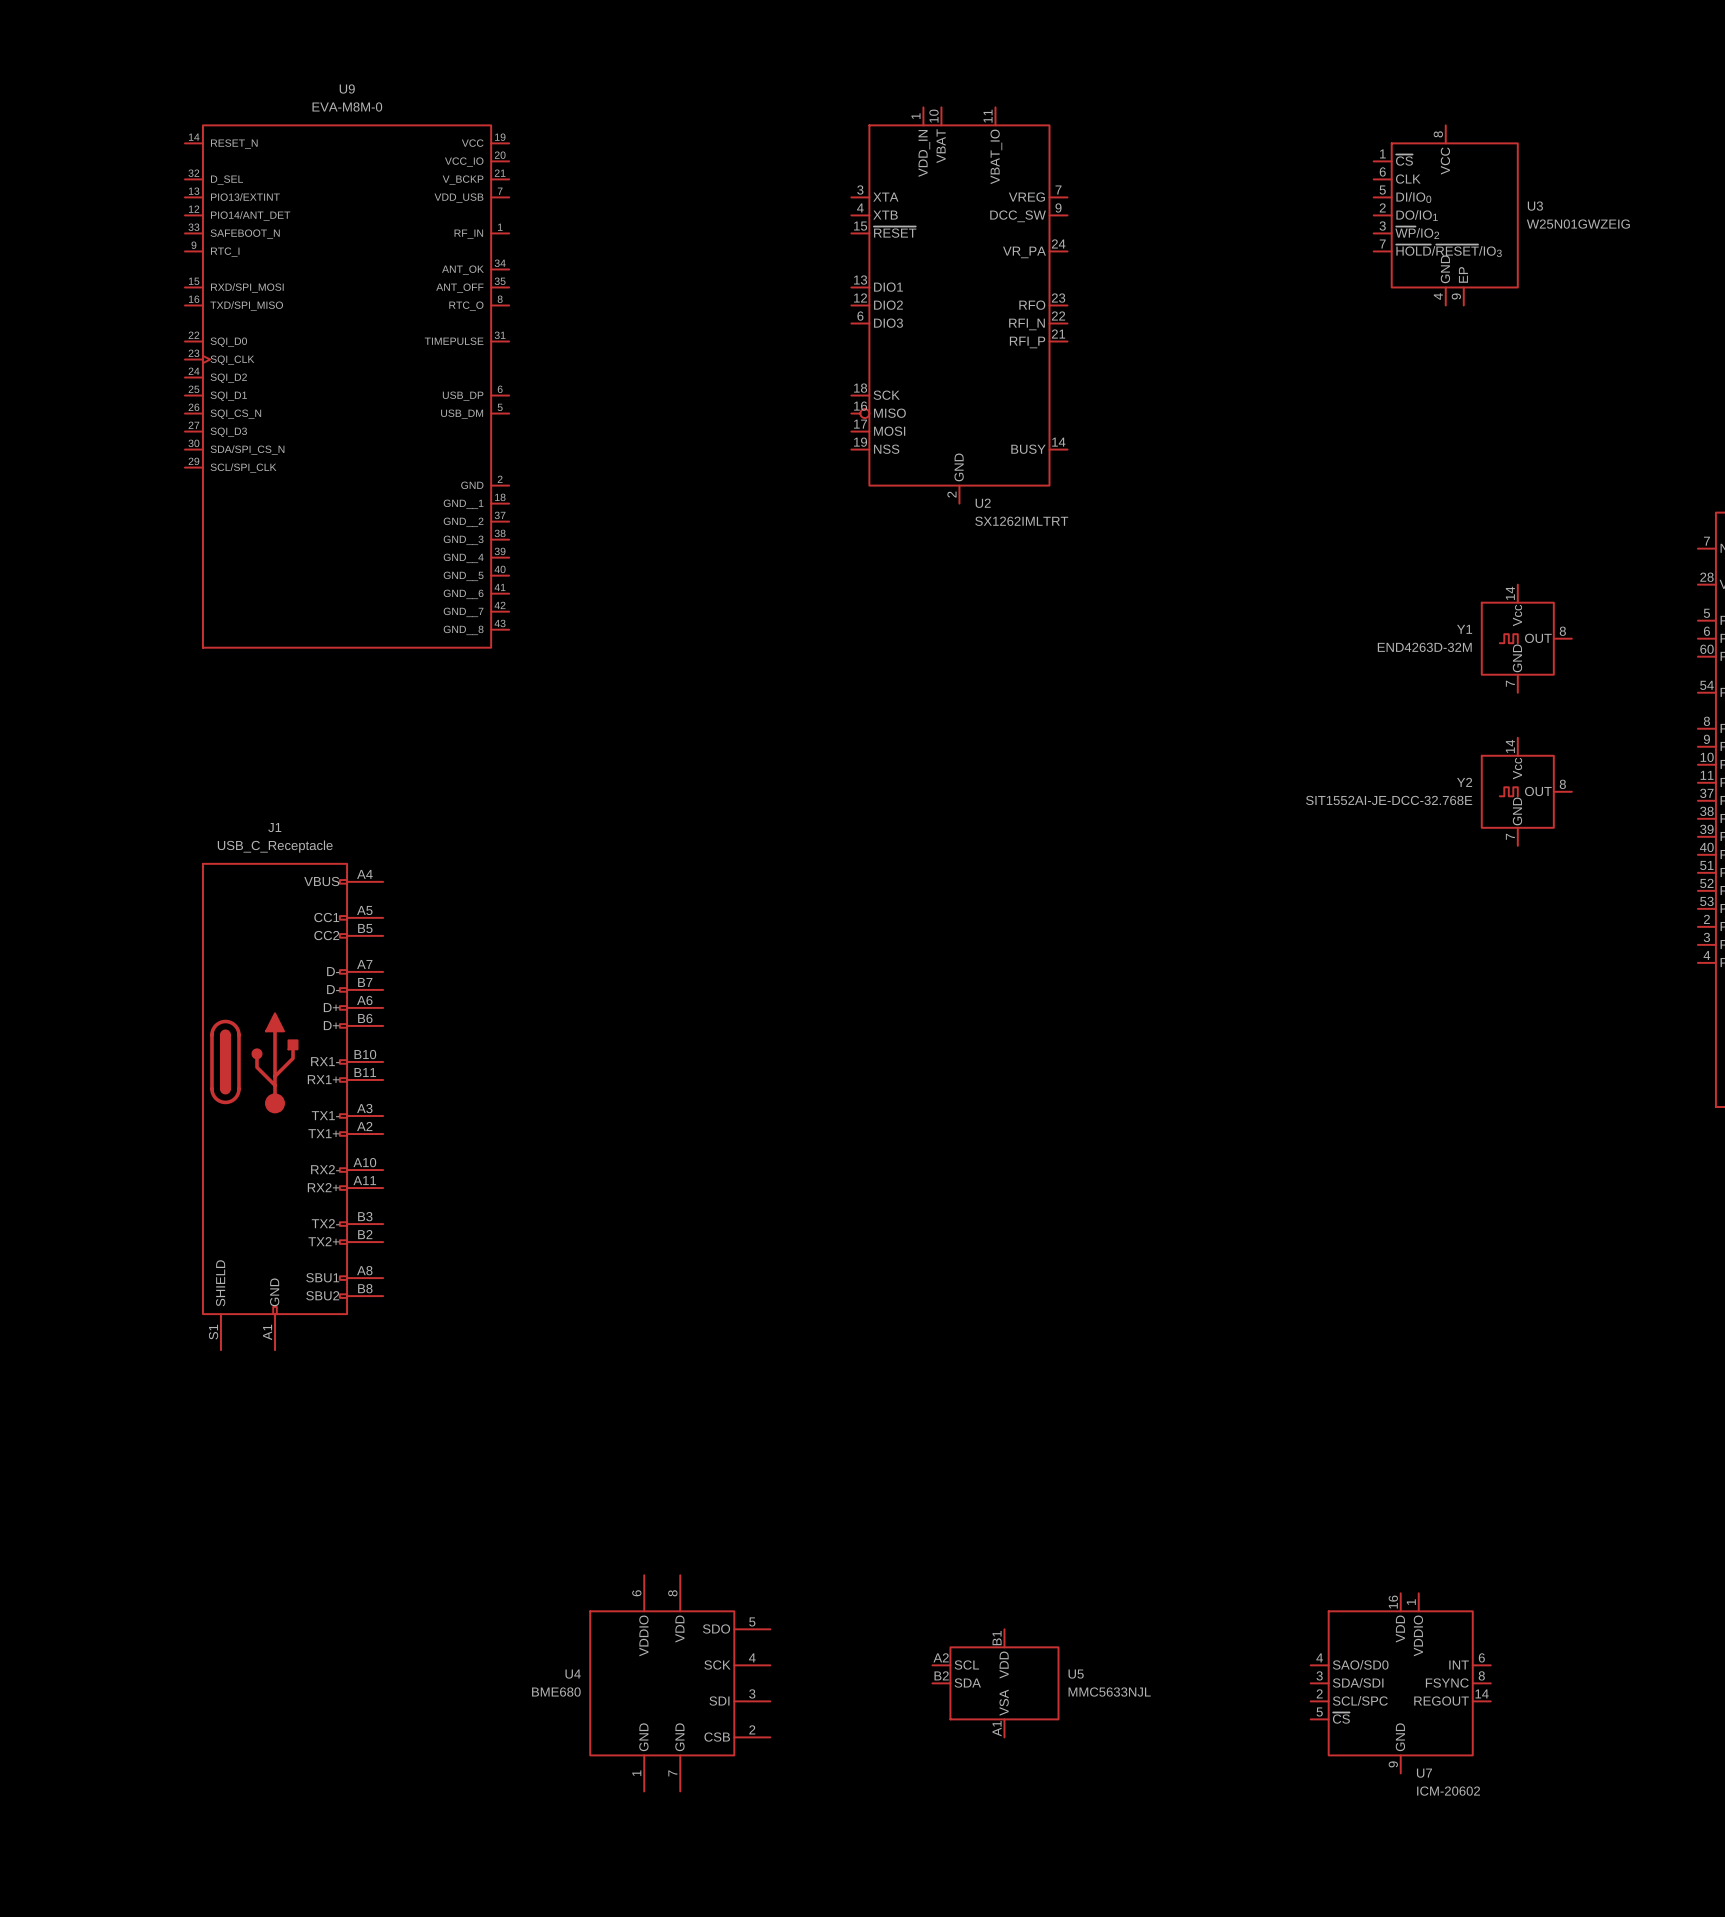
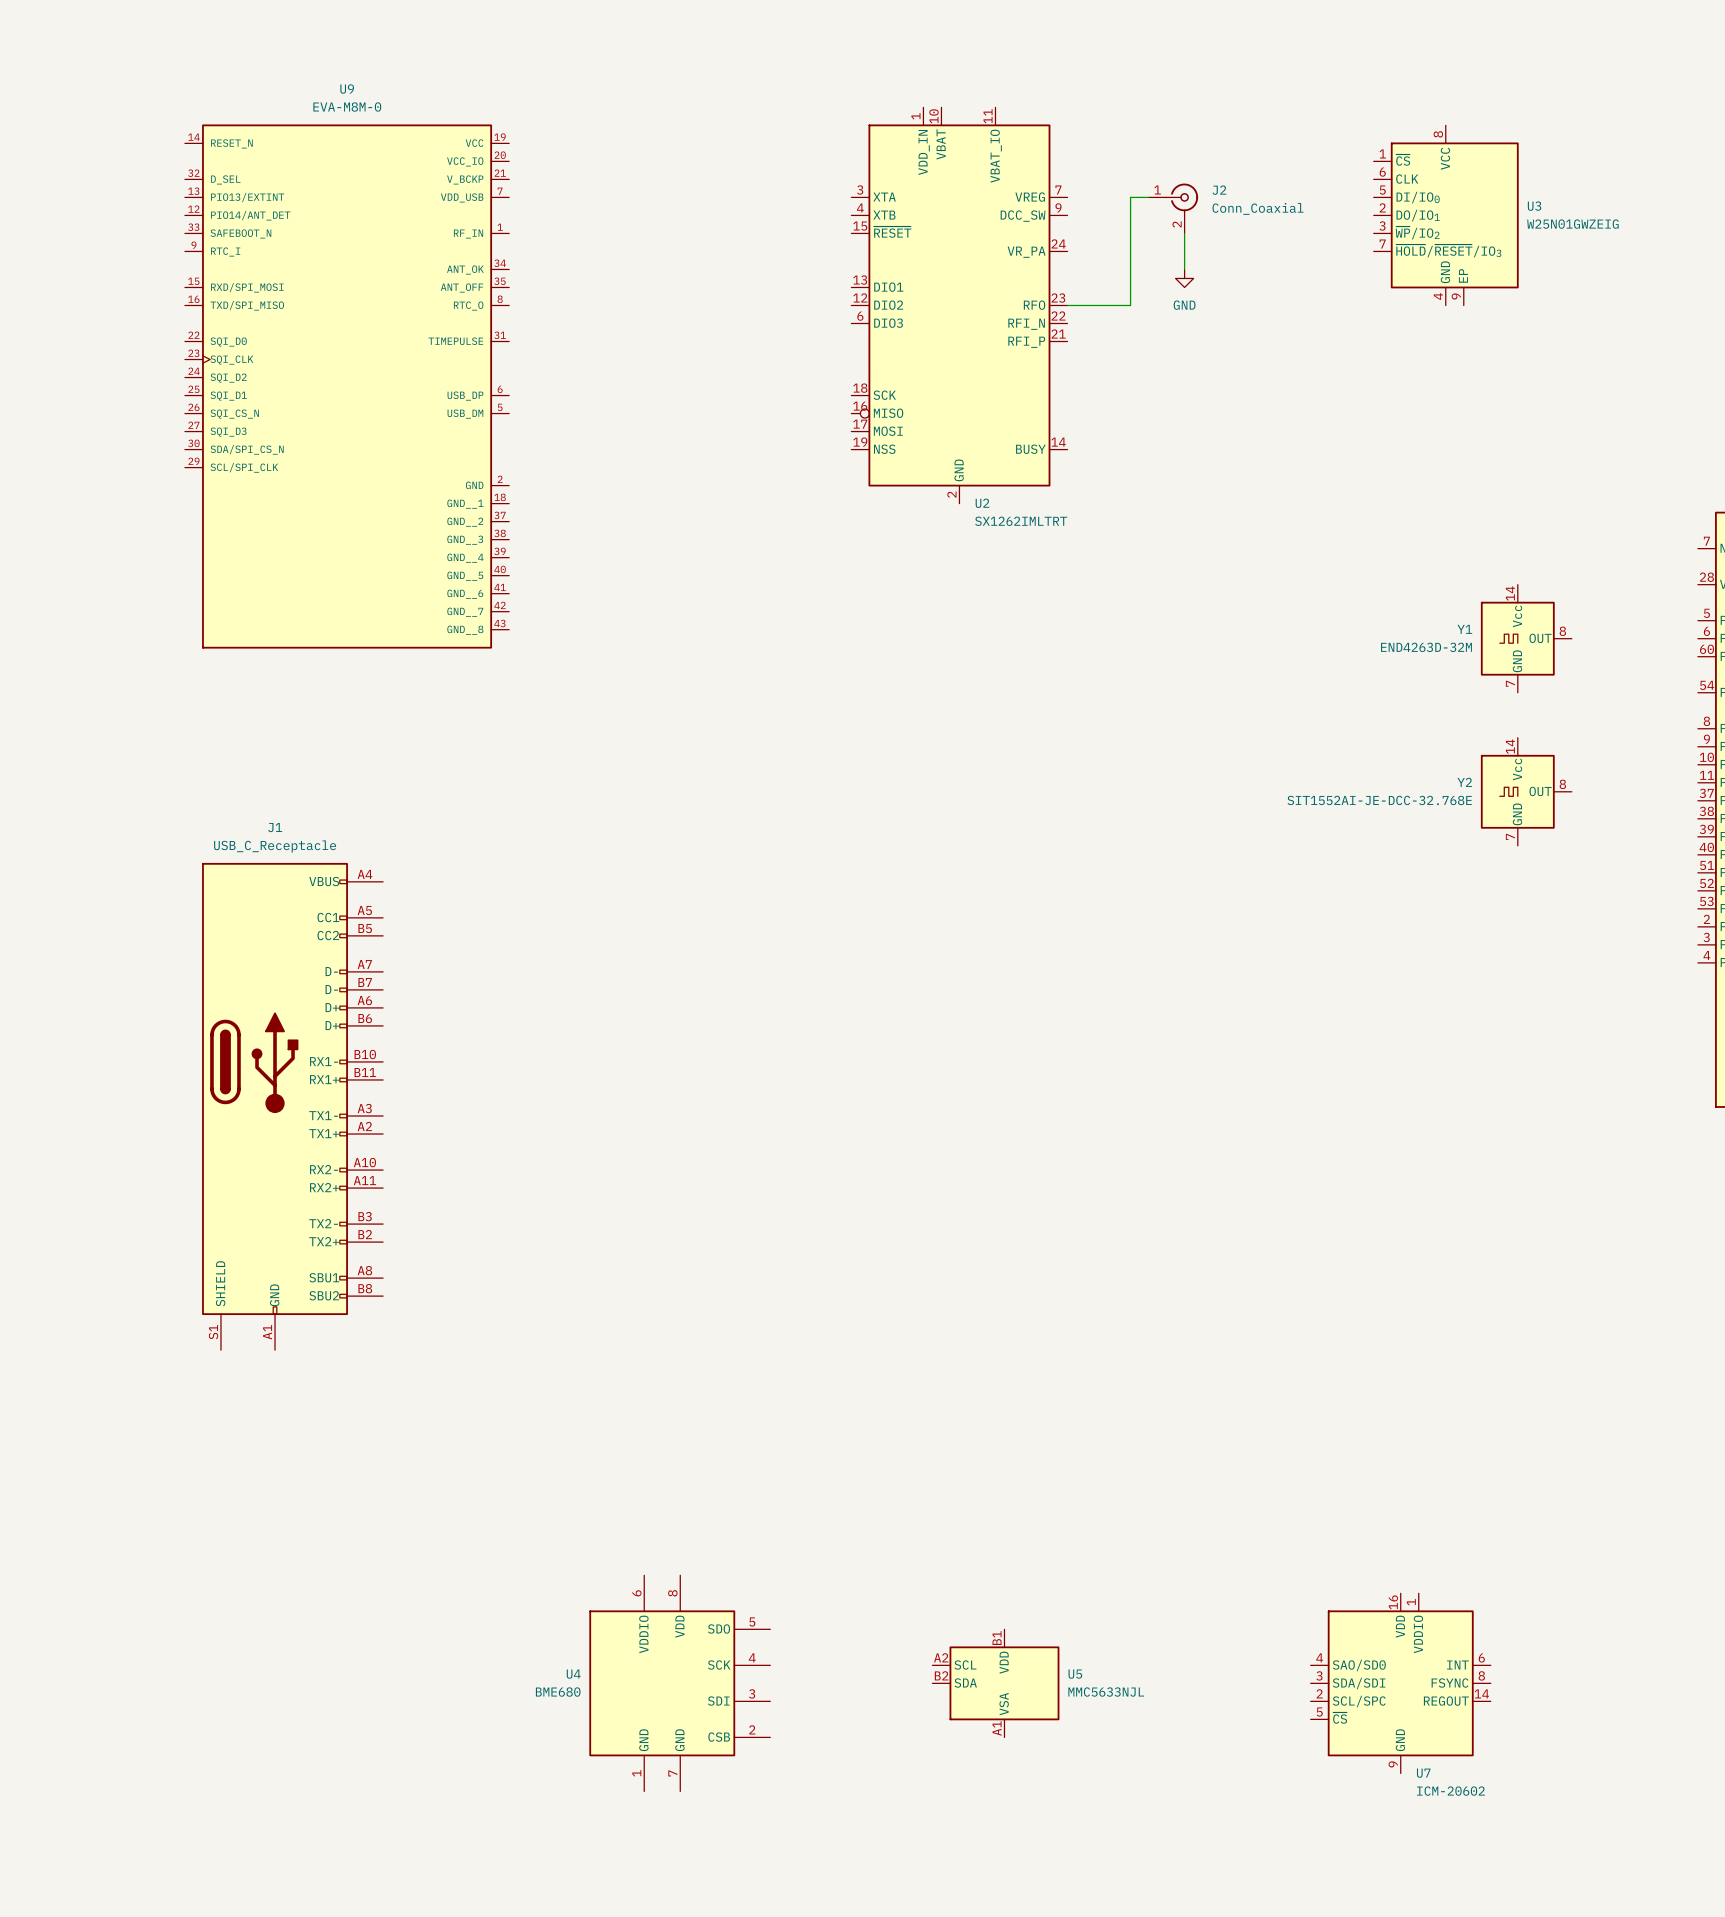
wire: none -> (1148, 197) (1130, 197) (1130, 305) (1067, 305)
J2: none -> Conn_Coaxial (1173, 208)
wire: none -> (1184, 233) (1184, 269)
power symbol: none -> GND (1184, 278)

